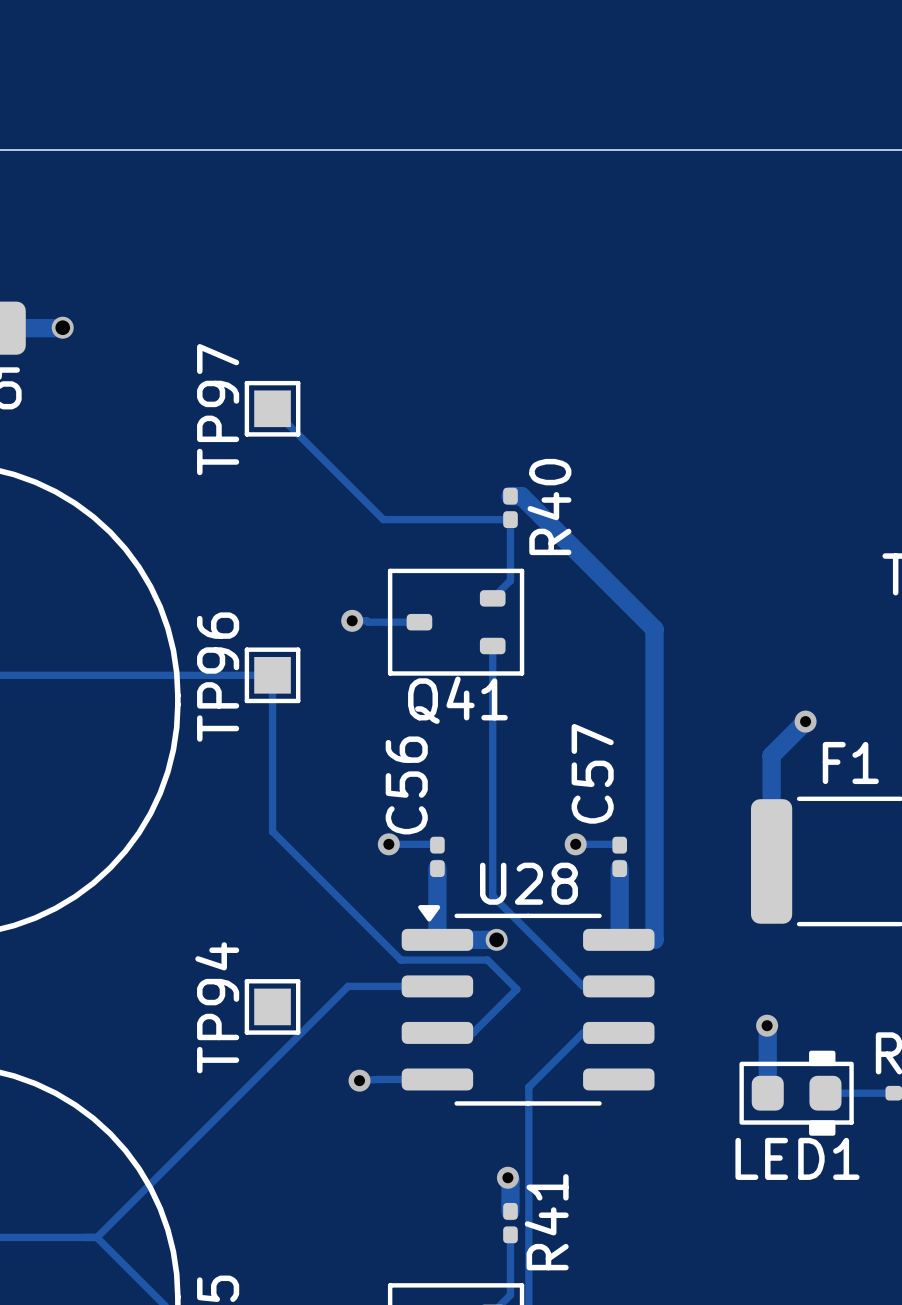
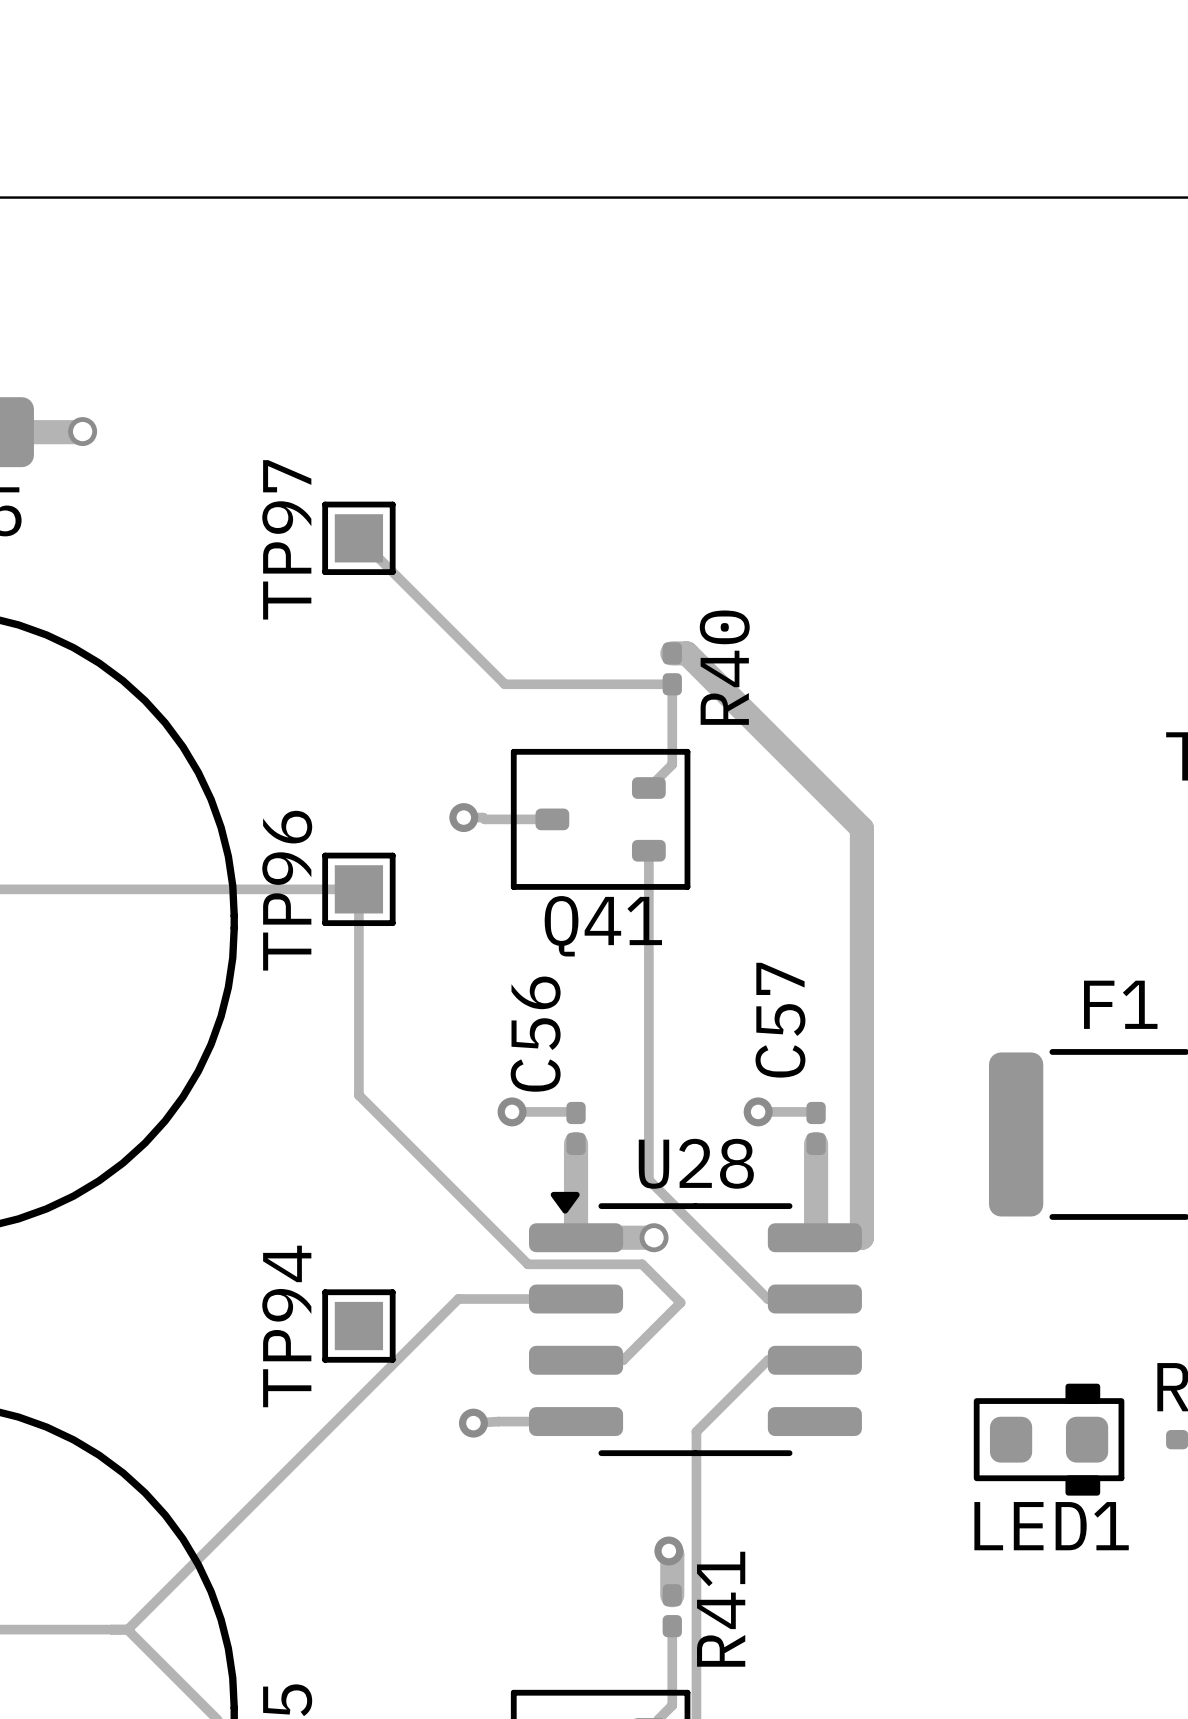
track: (805, 721) (771, 755) (771, 861) -> none
via: (805, 721) -> none
track: (767, 1025) (767, 1093) -> none
via: (767, 1025) -> none
track: (825, 1093) (893, 1093) -> none

